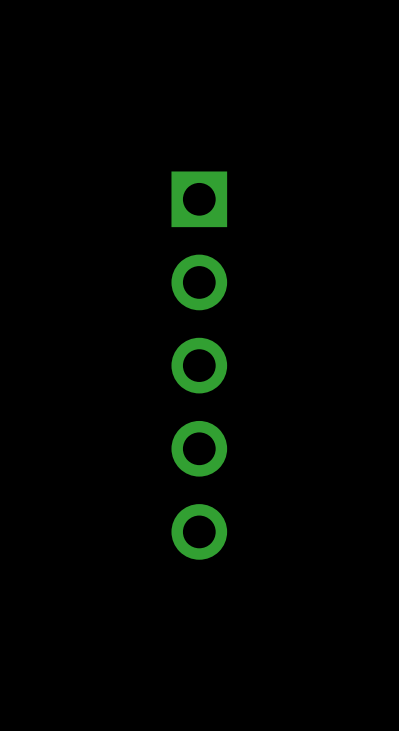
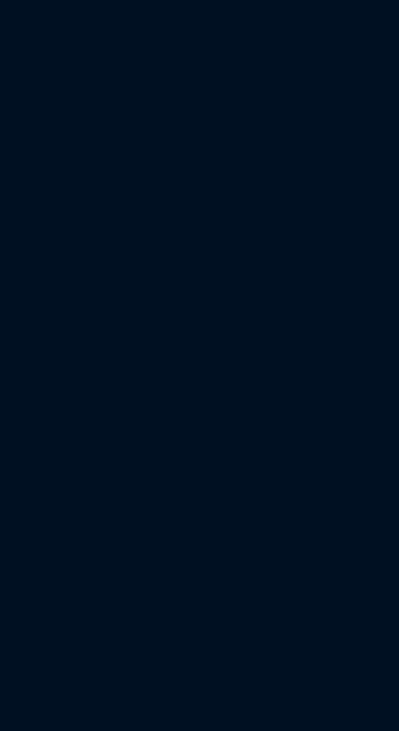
part: (199, 365) -> none

